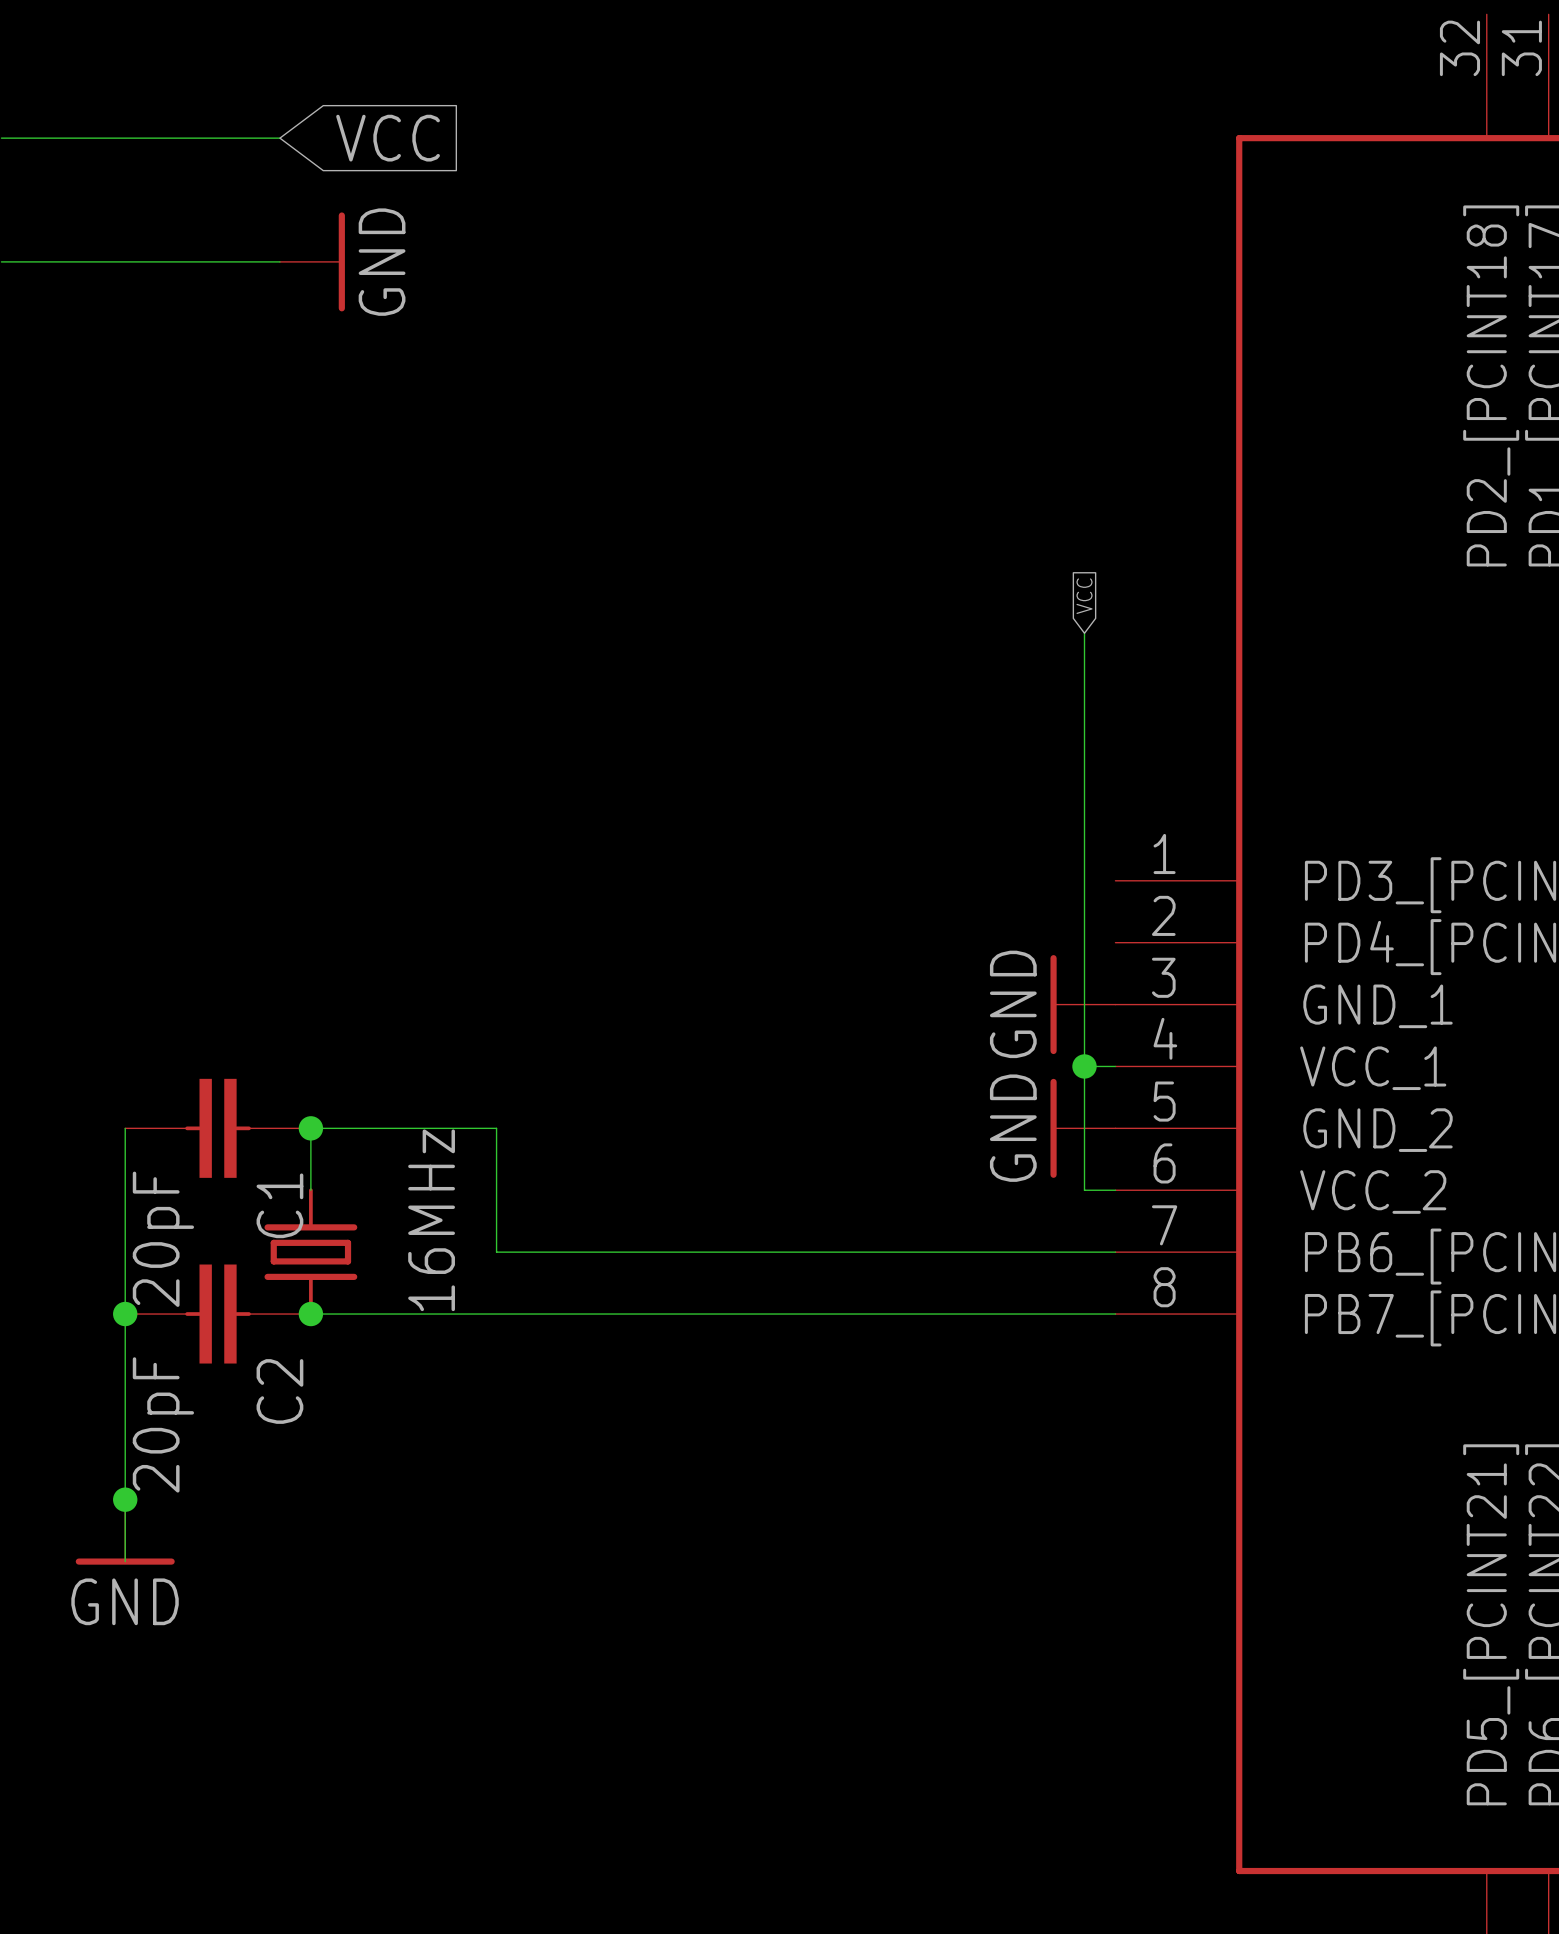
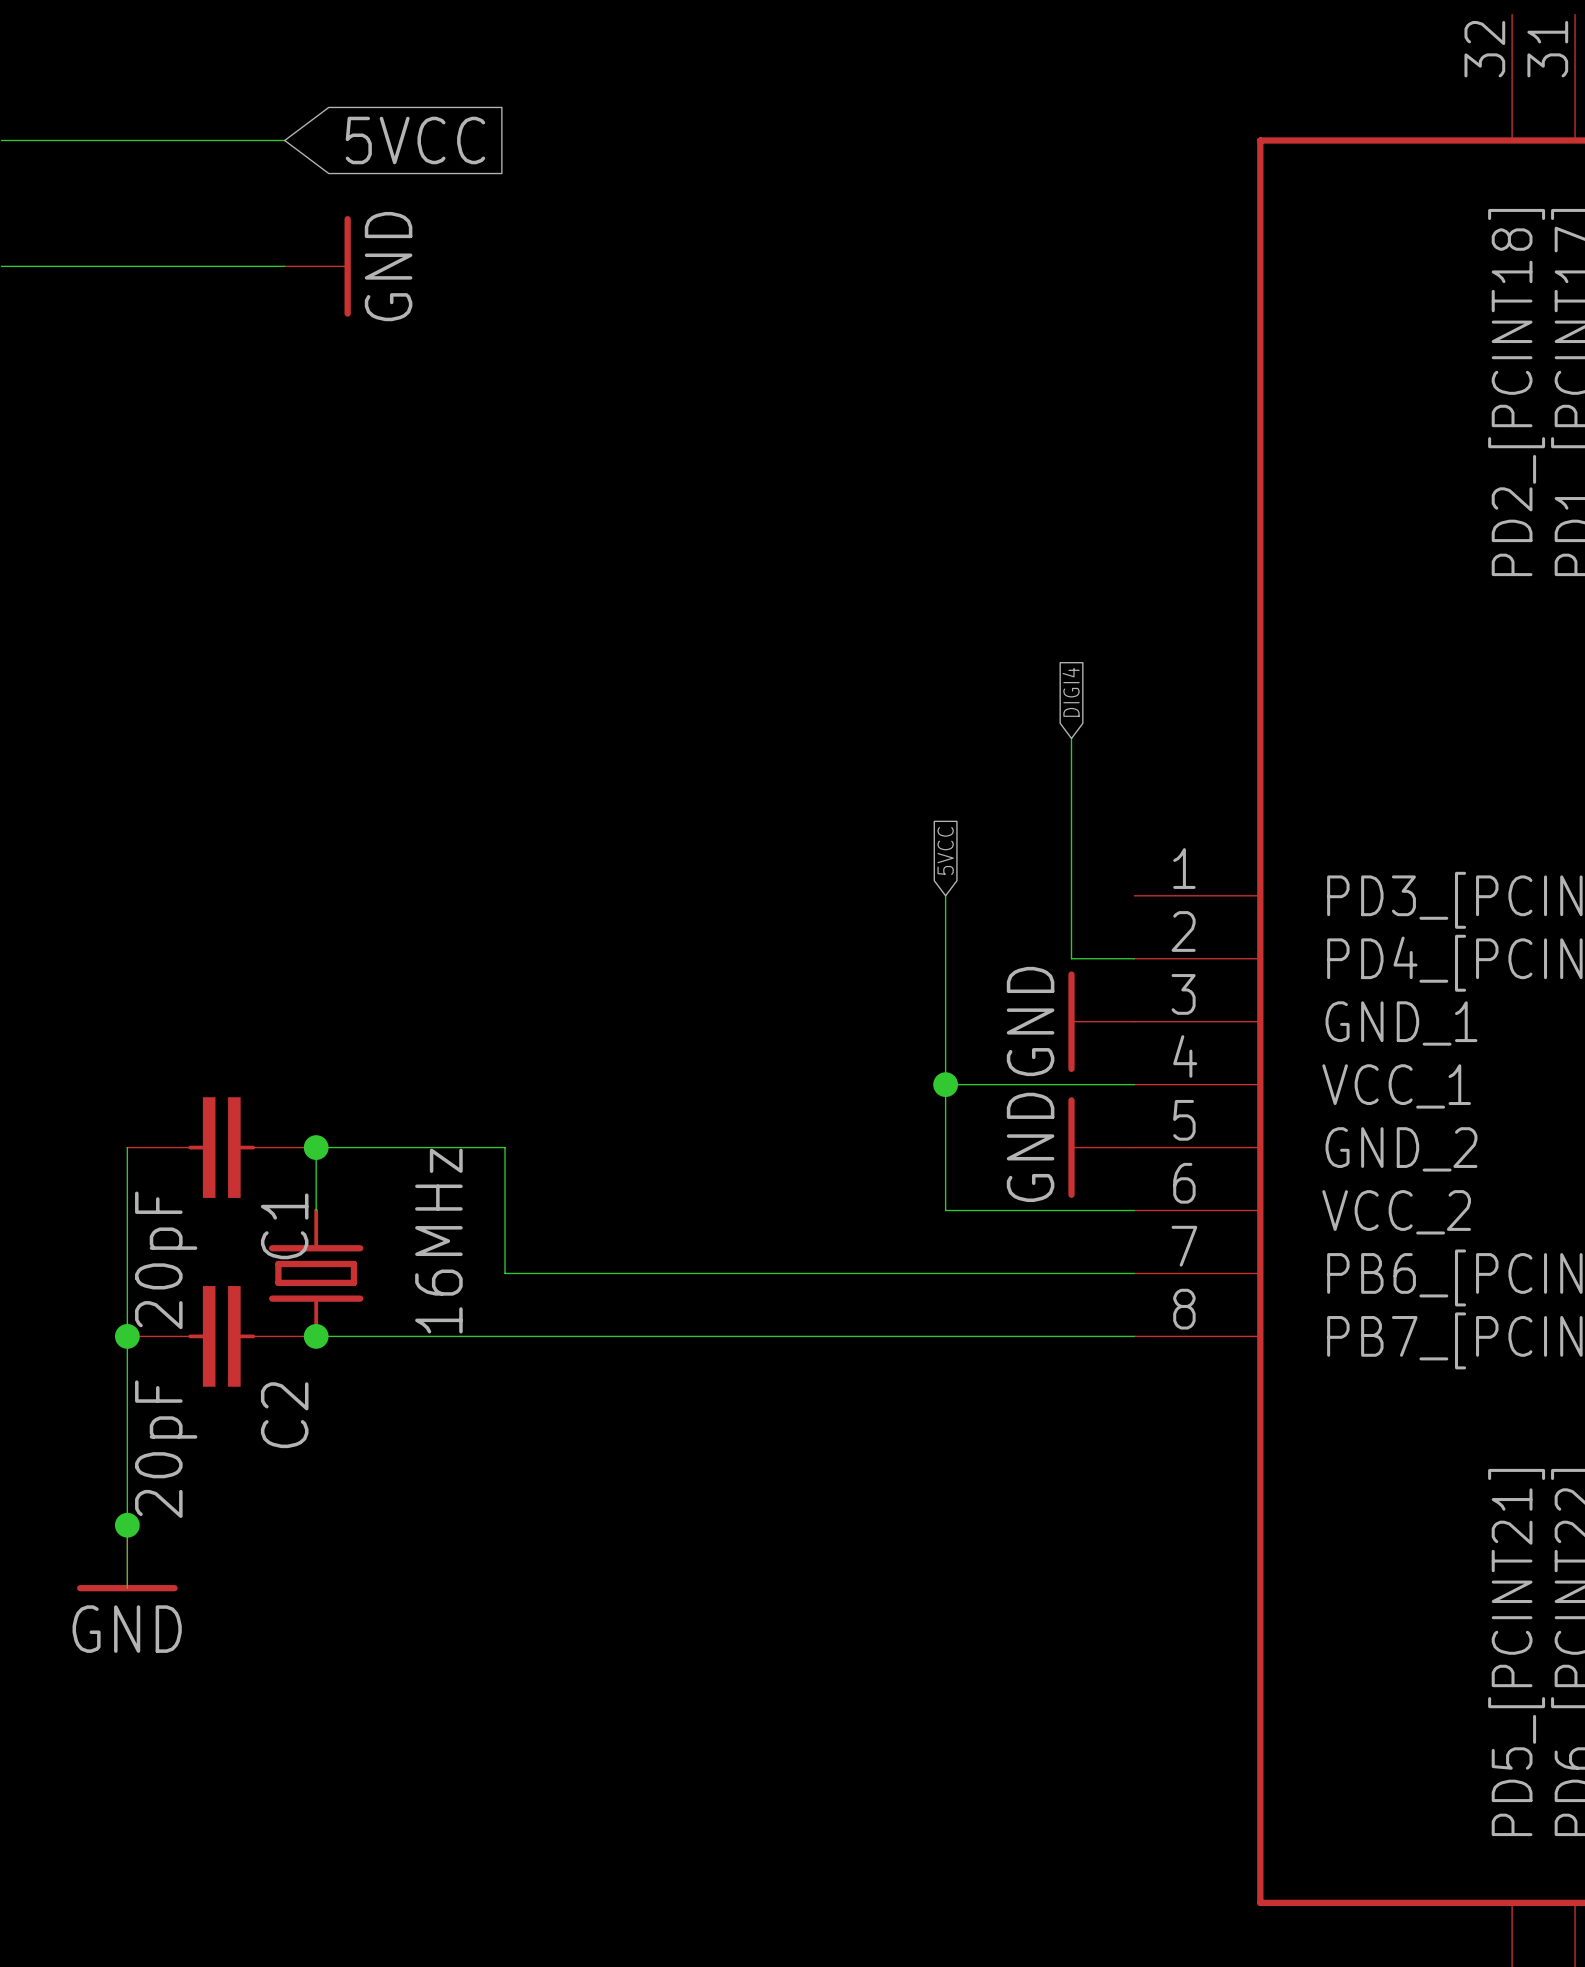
global label: VCC (388, 138) -> 5VCC (415, 140)
global label: VCC (1084, 596) -> none
wire: (1084, 633) (1084, 1190) -> (945, 895) (945, 1210) (1102, 1210)
global label: none -> DIGI4 (1071, 692)
wire: none -> (1071, 738) (1071, 958) (1134, 958)
global label: none -> 5VCC (945, 850)
wire: none -> (945, 1084) (1102, 1084)
junction: none -> (945, 1084)
junction: (1084, 1066) -> none

